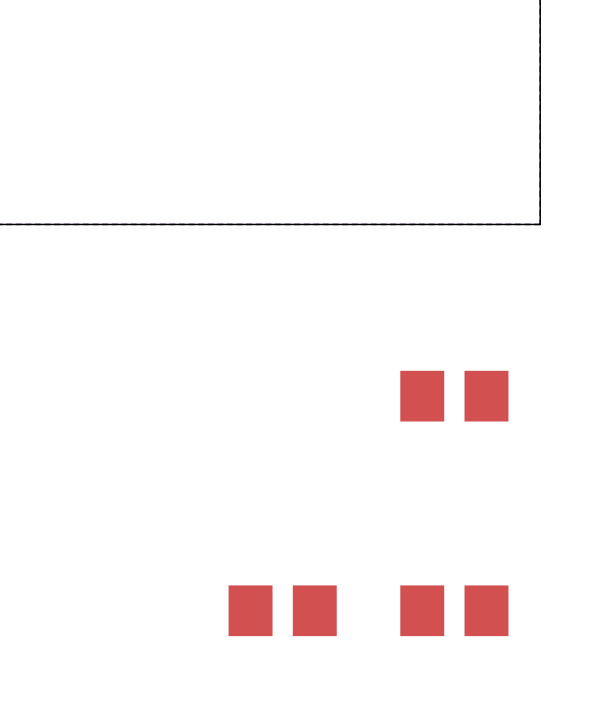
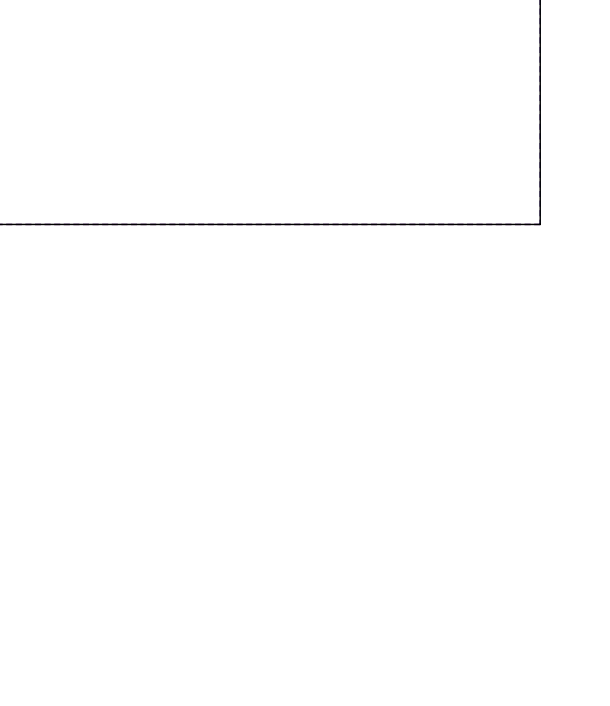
part: (454, 396) -> none
part: (282, 610) -> none
part: (454, 610) -> none

